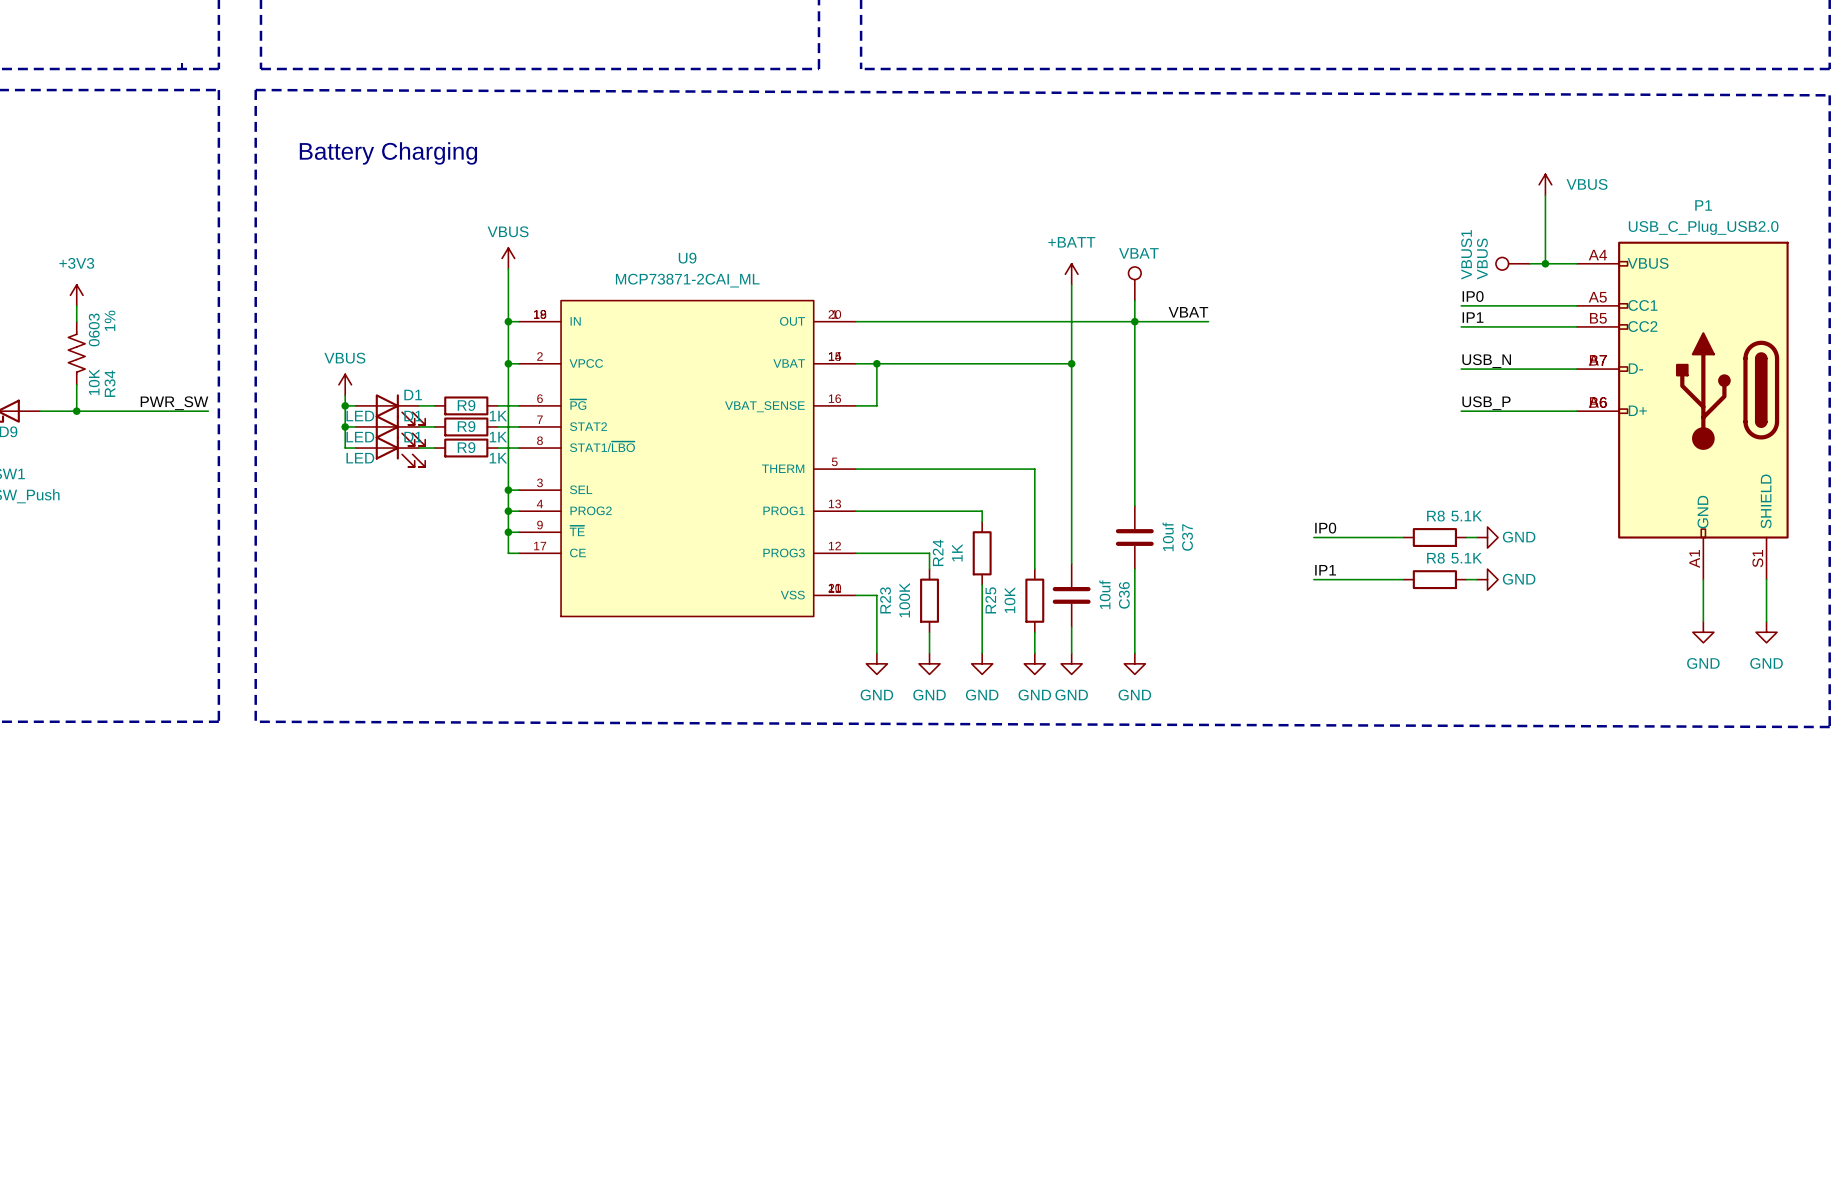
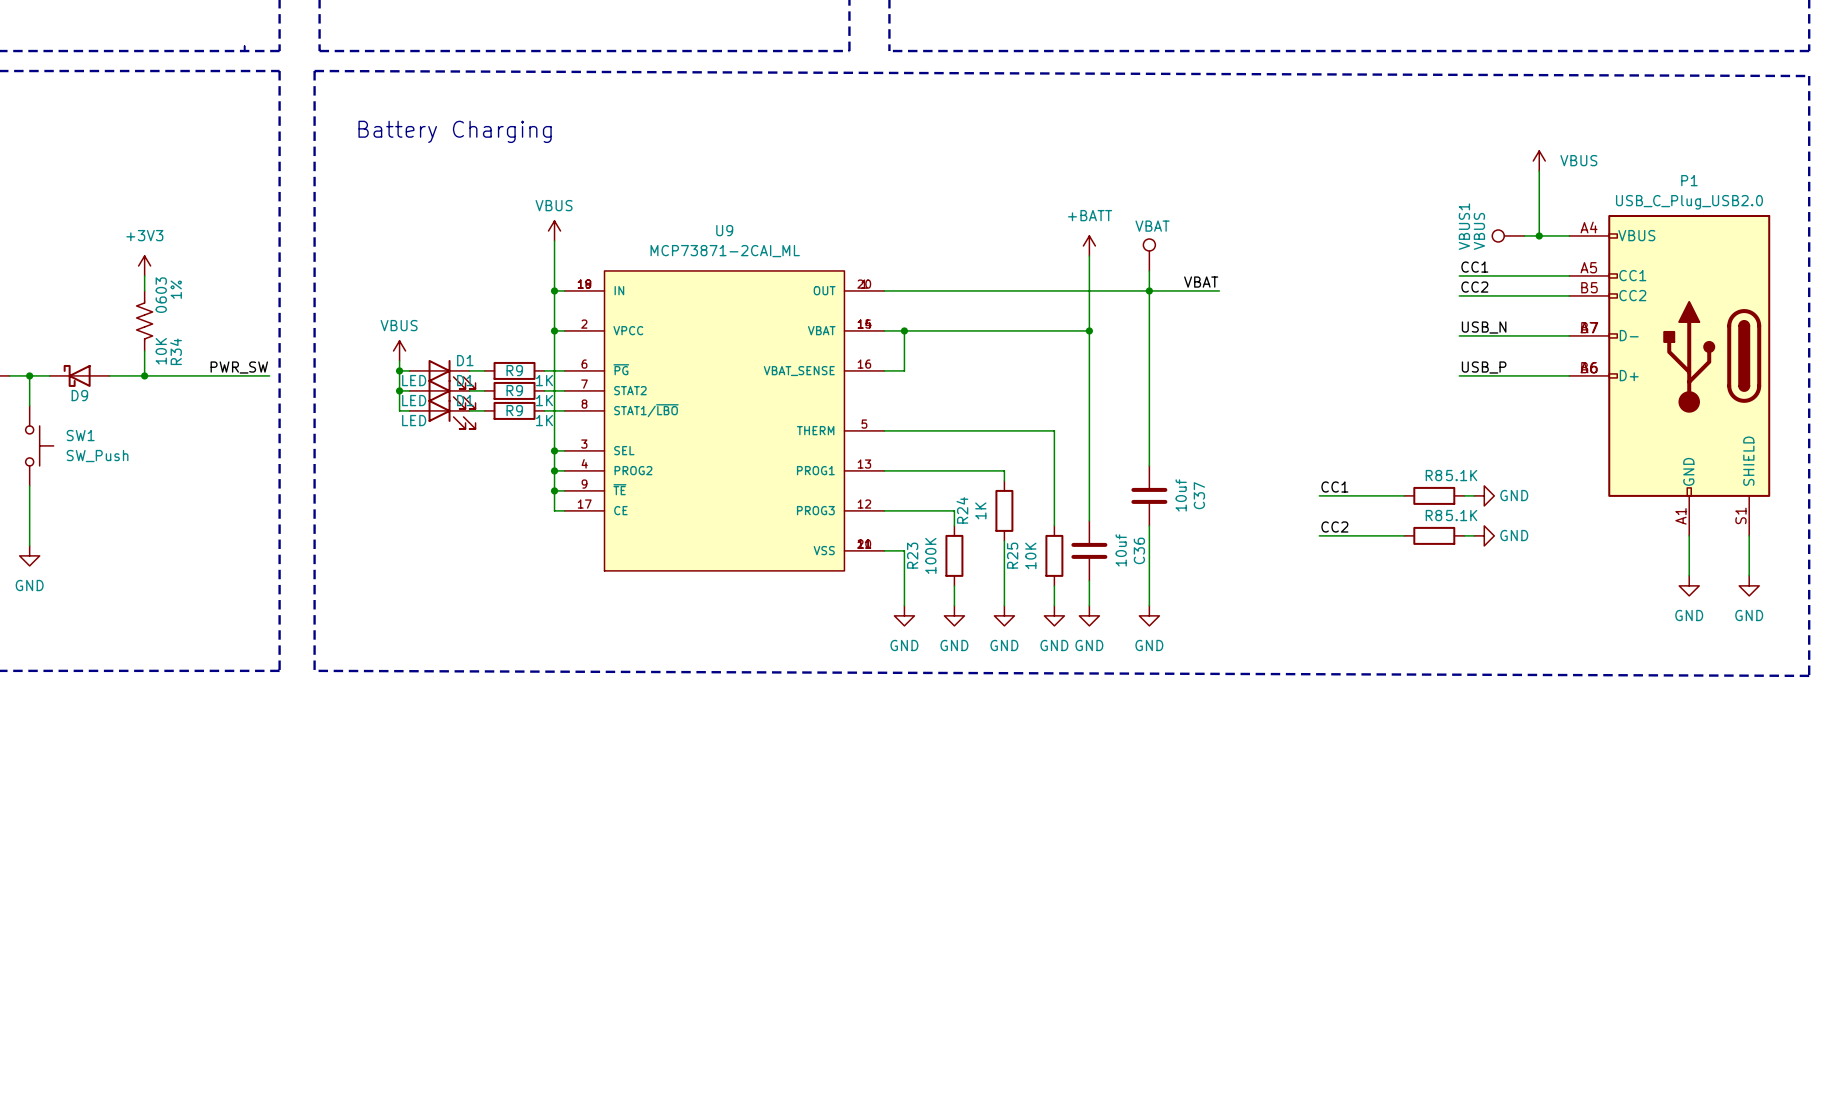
label: IP0 (1473, 296) -> CC1 (1474, 267)
label: IP1 (1473, 317) -> CC2 (1474, 287)
label: IP0 (1325, 528) -> CC1 (1334, 486)
label: IP1 (1325, 570) -> CC2 (1334, 526)

